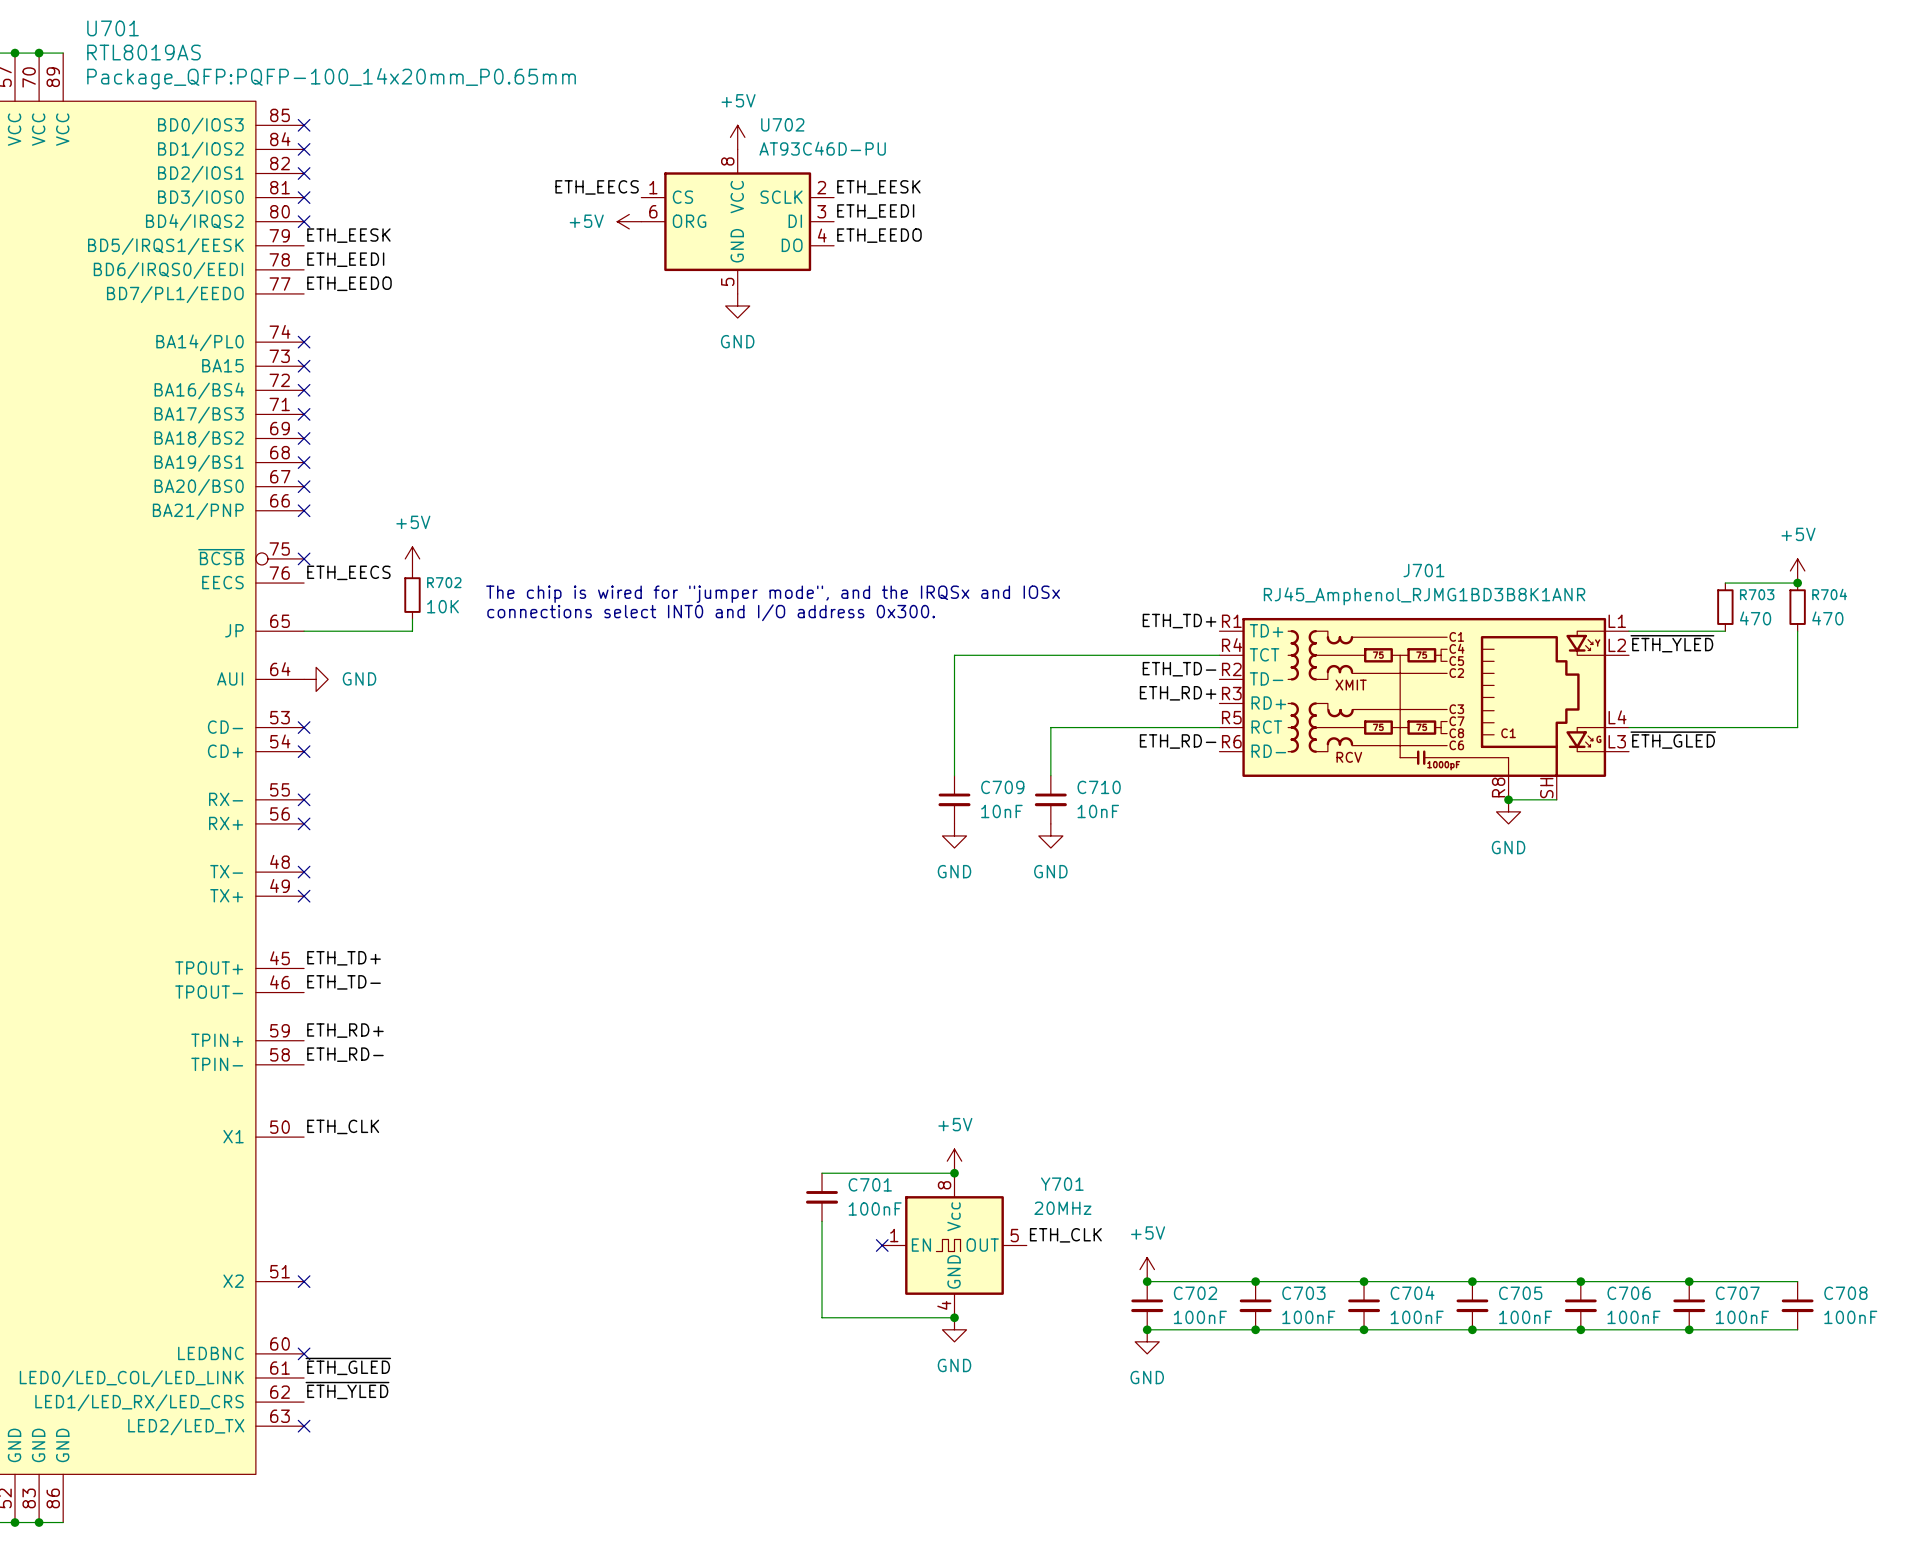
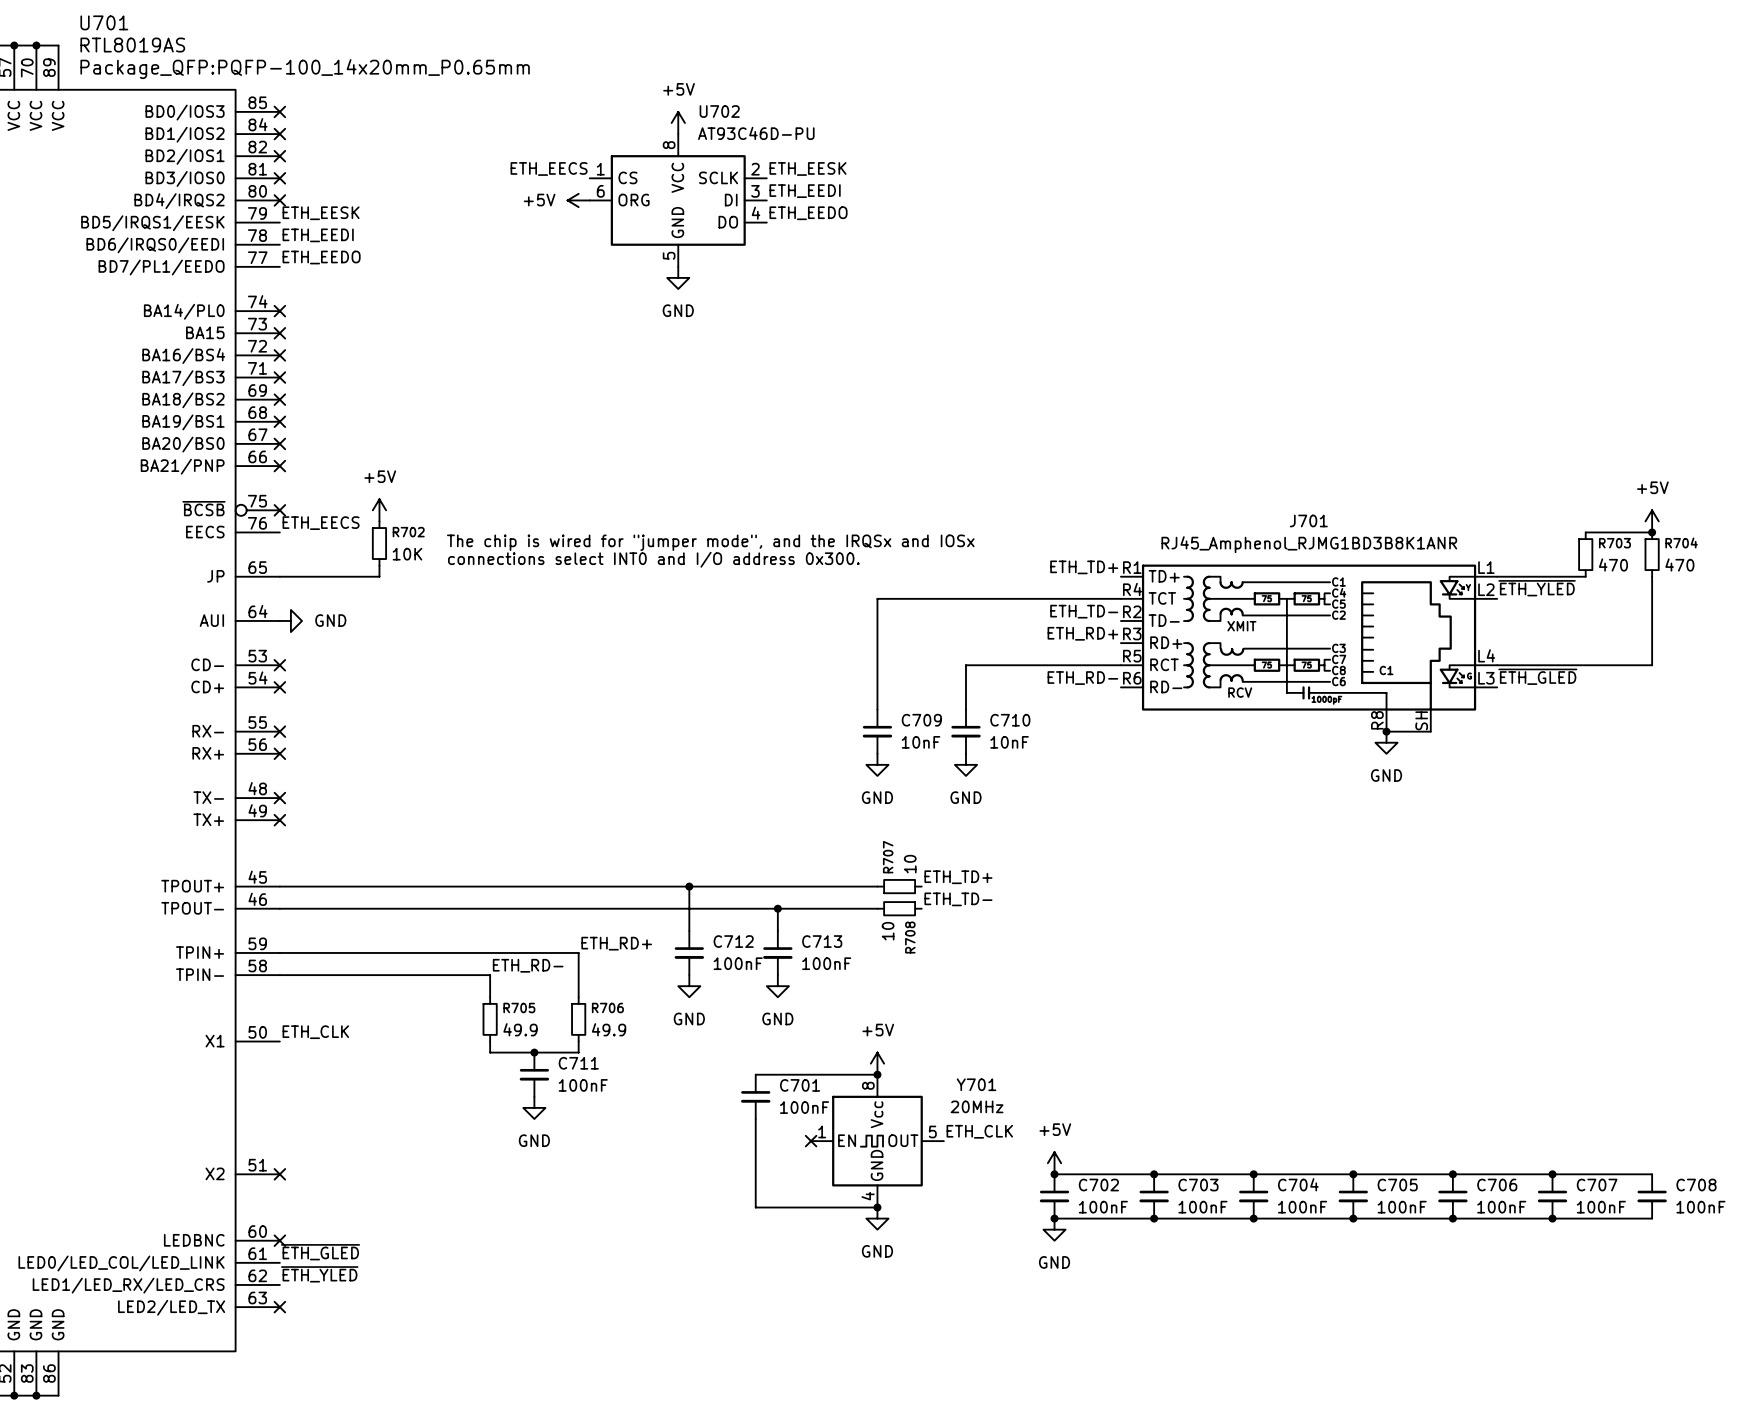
label: ETH_TD+ (344, 958) -> none
label: none -> ETH_TD+ (958, 877)
wire: none -> (279, 886) (877, 886)
wire: none -> (689, 886) (689, 930)
junction: none -> (689, 886)
R707: none -> 10 (899, 886)
label: ETH_TD- (344, 982) -> none
label: none -> ETH_TD- (958, 899)
wire: none -> (279, 908) (877, 908)
wire: none -> (777, 908) (777, 930)
junction: none -> (777, 908)
R708: none -> 10 (899, 908)
label: ETH_RD+ (345, 1030) -> none
label: none -> ETH_RD+ (616, 943)
wire: none -> (279, 952) (578, 952) (578, 997)
C712: none -> 100nF (689, 952)
C713: none -> 100nF (777, 952)
label position: ETH_RD- (345, 1054) -> ETH_RD- (528, 965)
wire: none -> (279, 975) (490, 975) (490, 997)
power symbol: none -> GND (689, 986)
power symbol: none -> GND (777, 986)
R705: none -> 49.9 (490, 1019)
R706: none -> 49.9 (578, 1019)
wire: none -> (490, 1041) (490, 1052) (578, 1052) (578, 1041)
junction: none -> (534, 1052)
C711: none -> 100nF (534, 1074)
power symbol: none -> GND (534, 1107)

